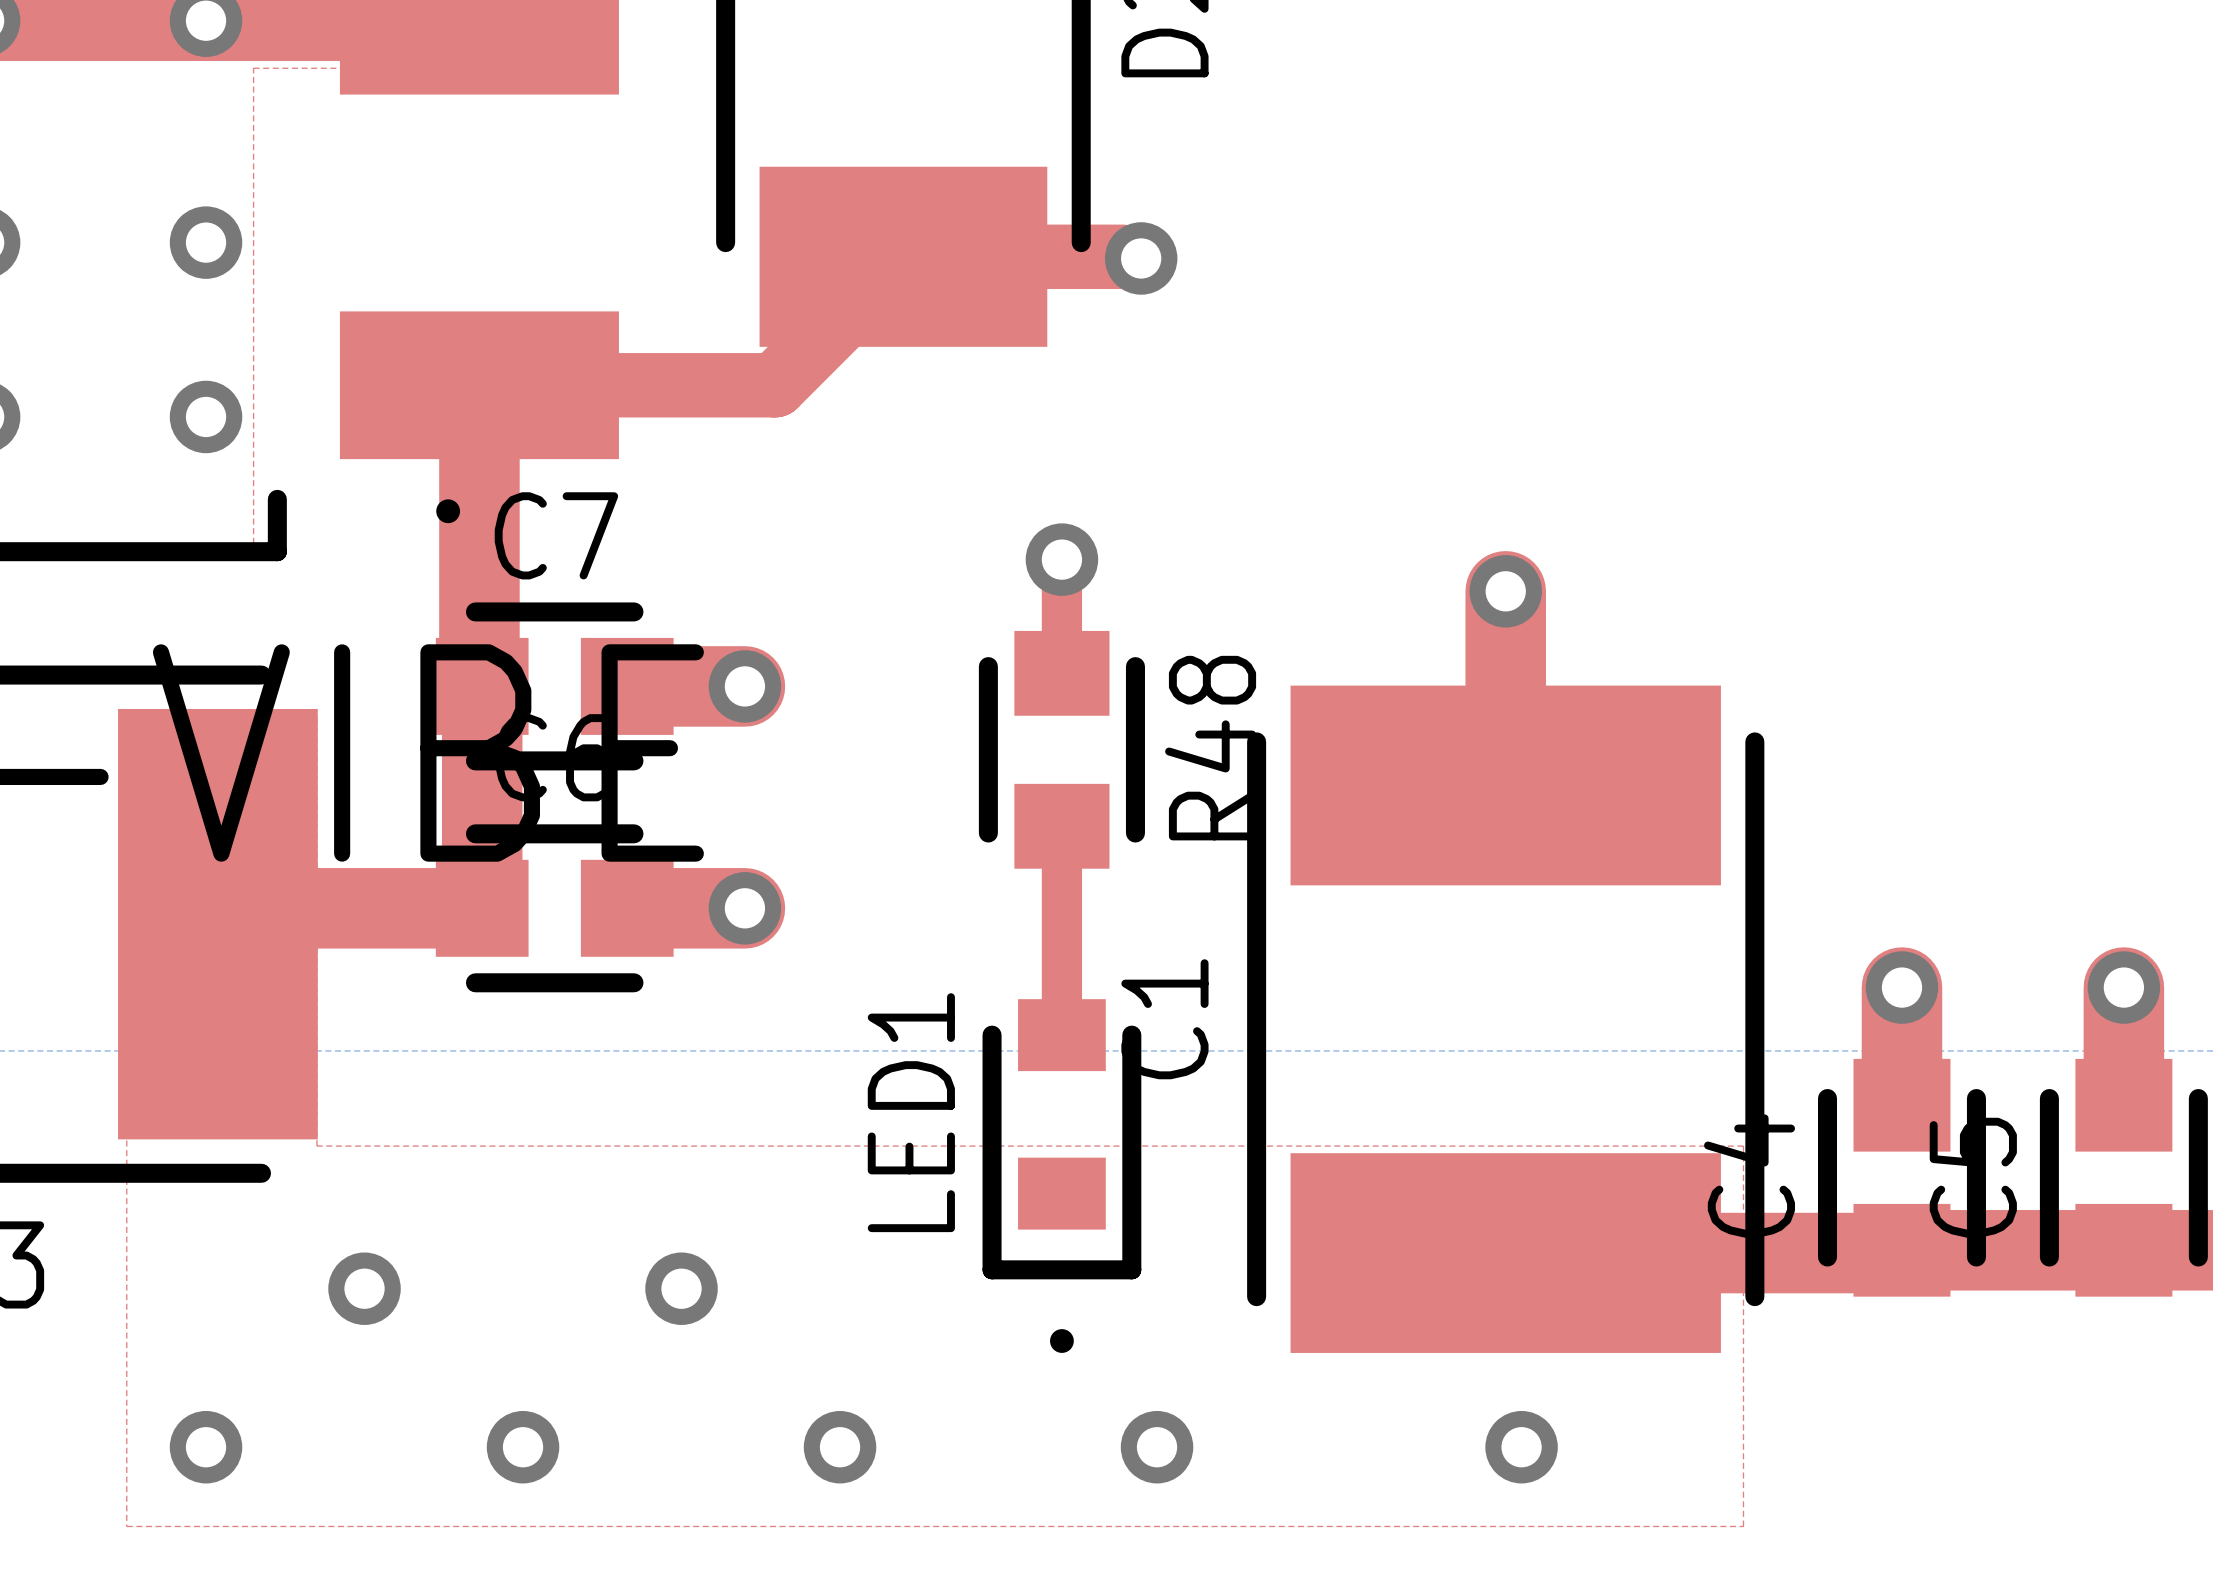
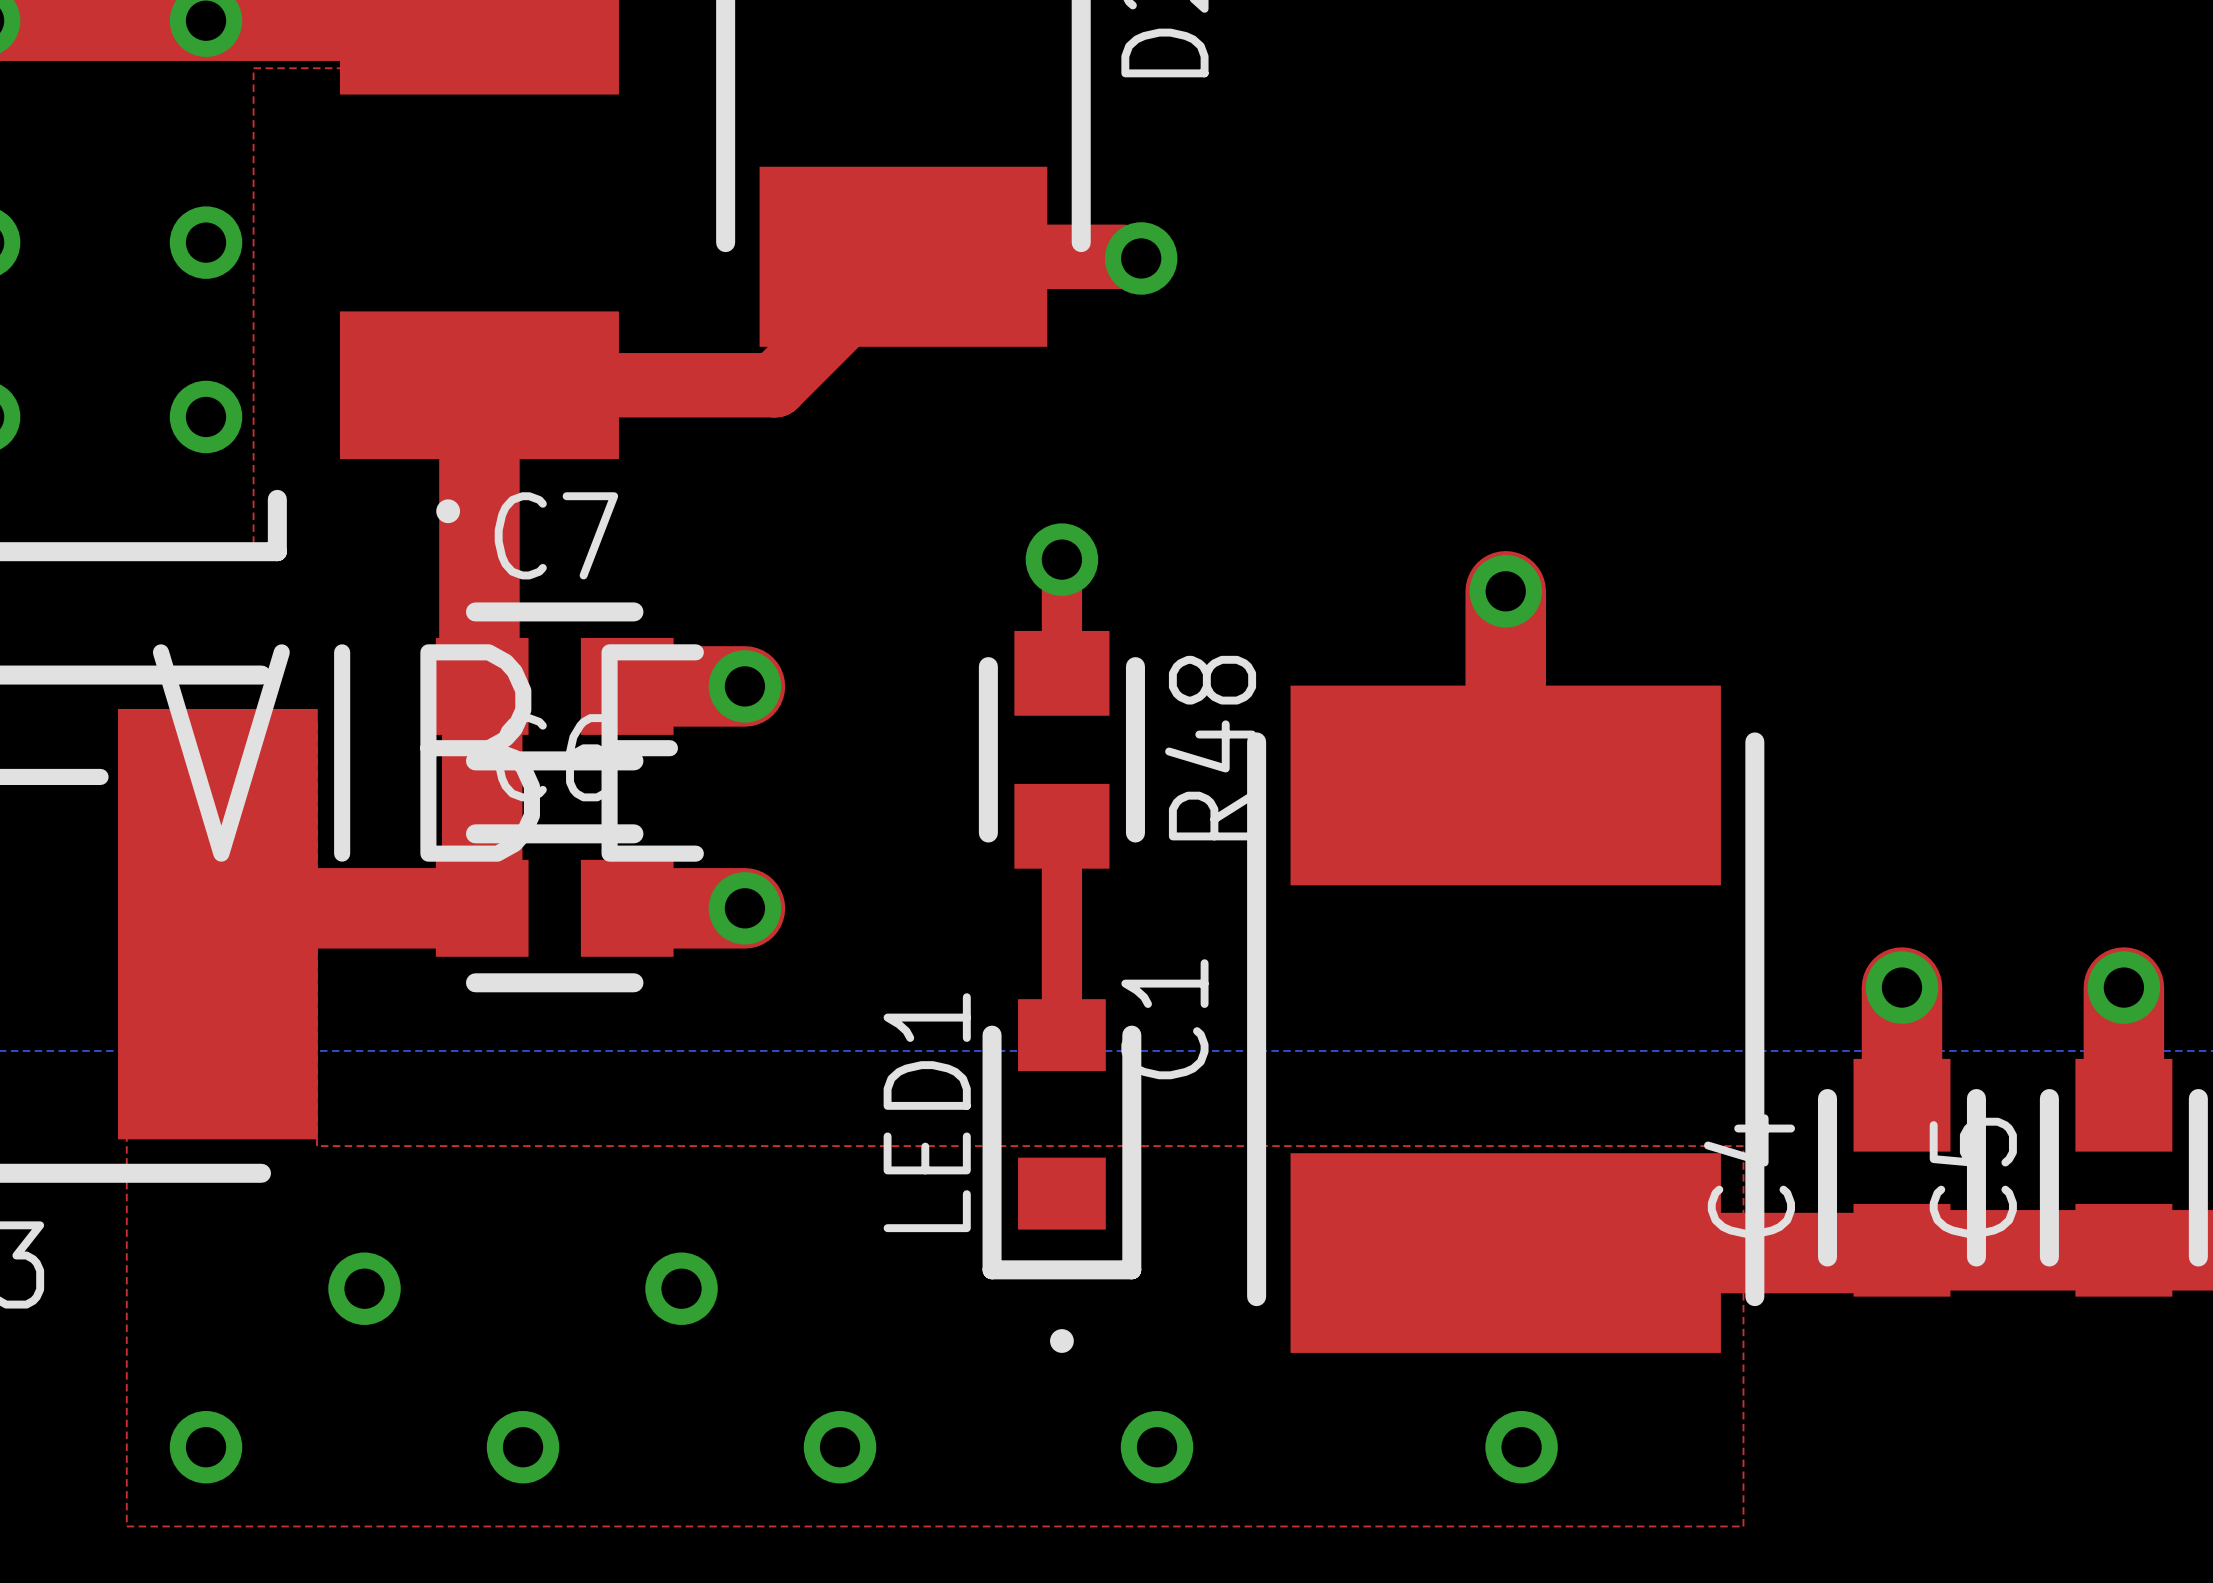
LED1 name position: LED1 (911, 1112) -> LED1 (927, 1112)

